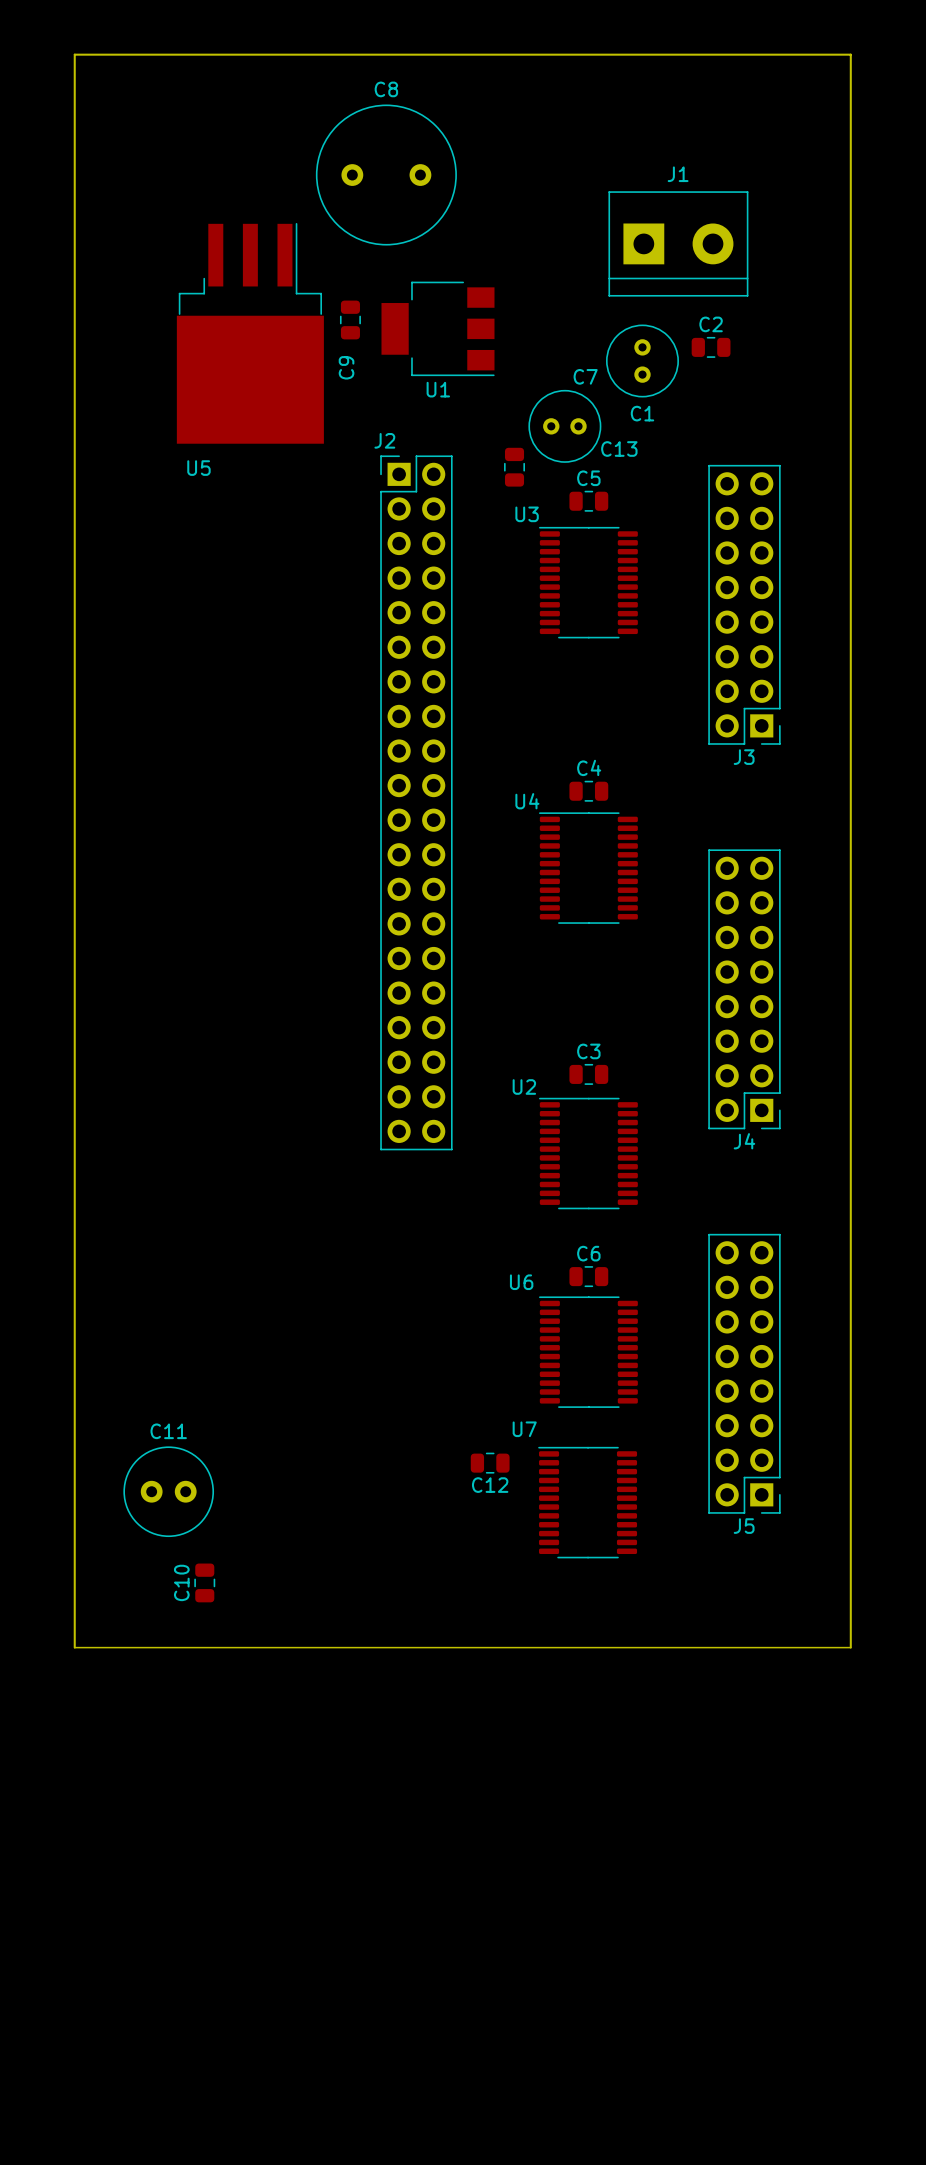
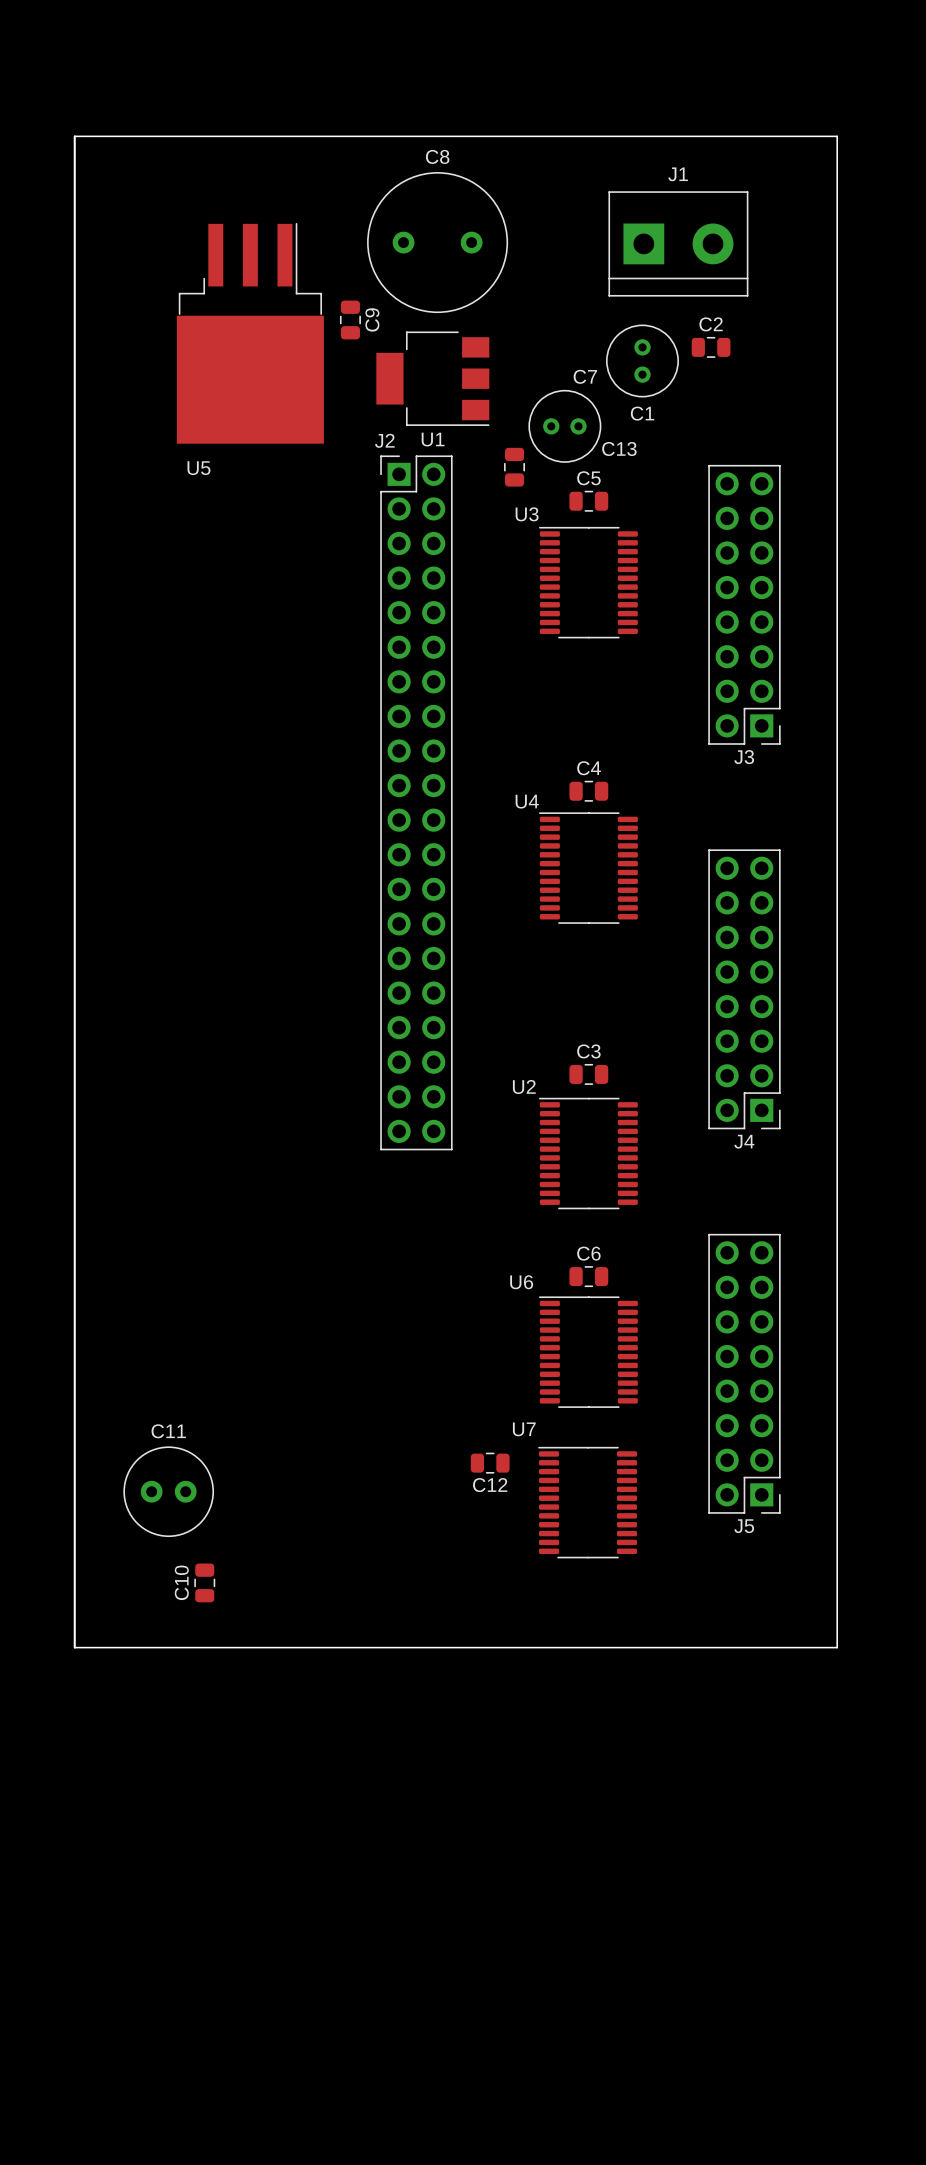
board edge: (74, 136) (74, 54) (850, 54) (850, 1647) (837, 1647) -> (74, 136) (837, 136) (837, 1647)
C8 position: (386, 175) -> (437, 242)
U1 position: (438, 328) -> (432, 378)
C9 name position: C9 (346, 367) -> C9 (372, 319)

